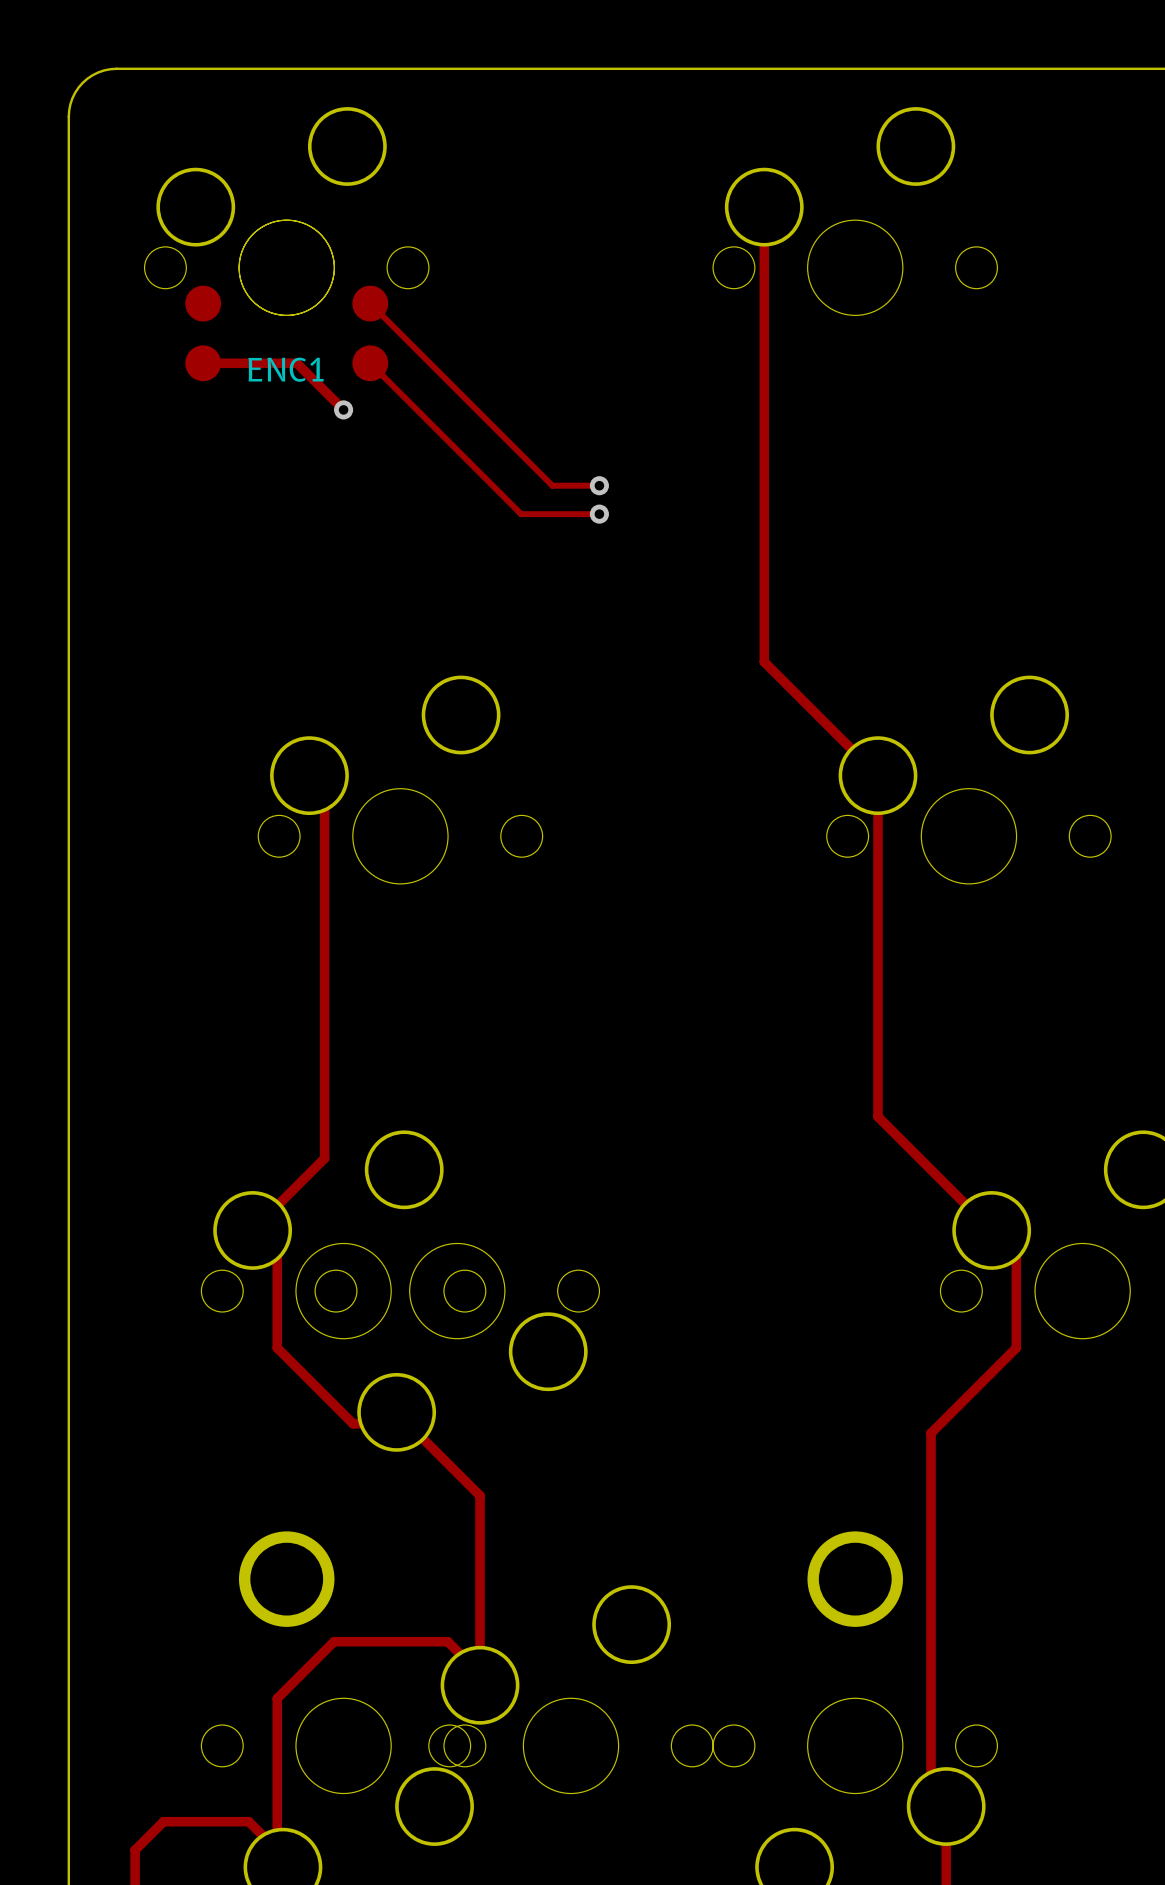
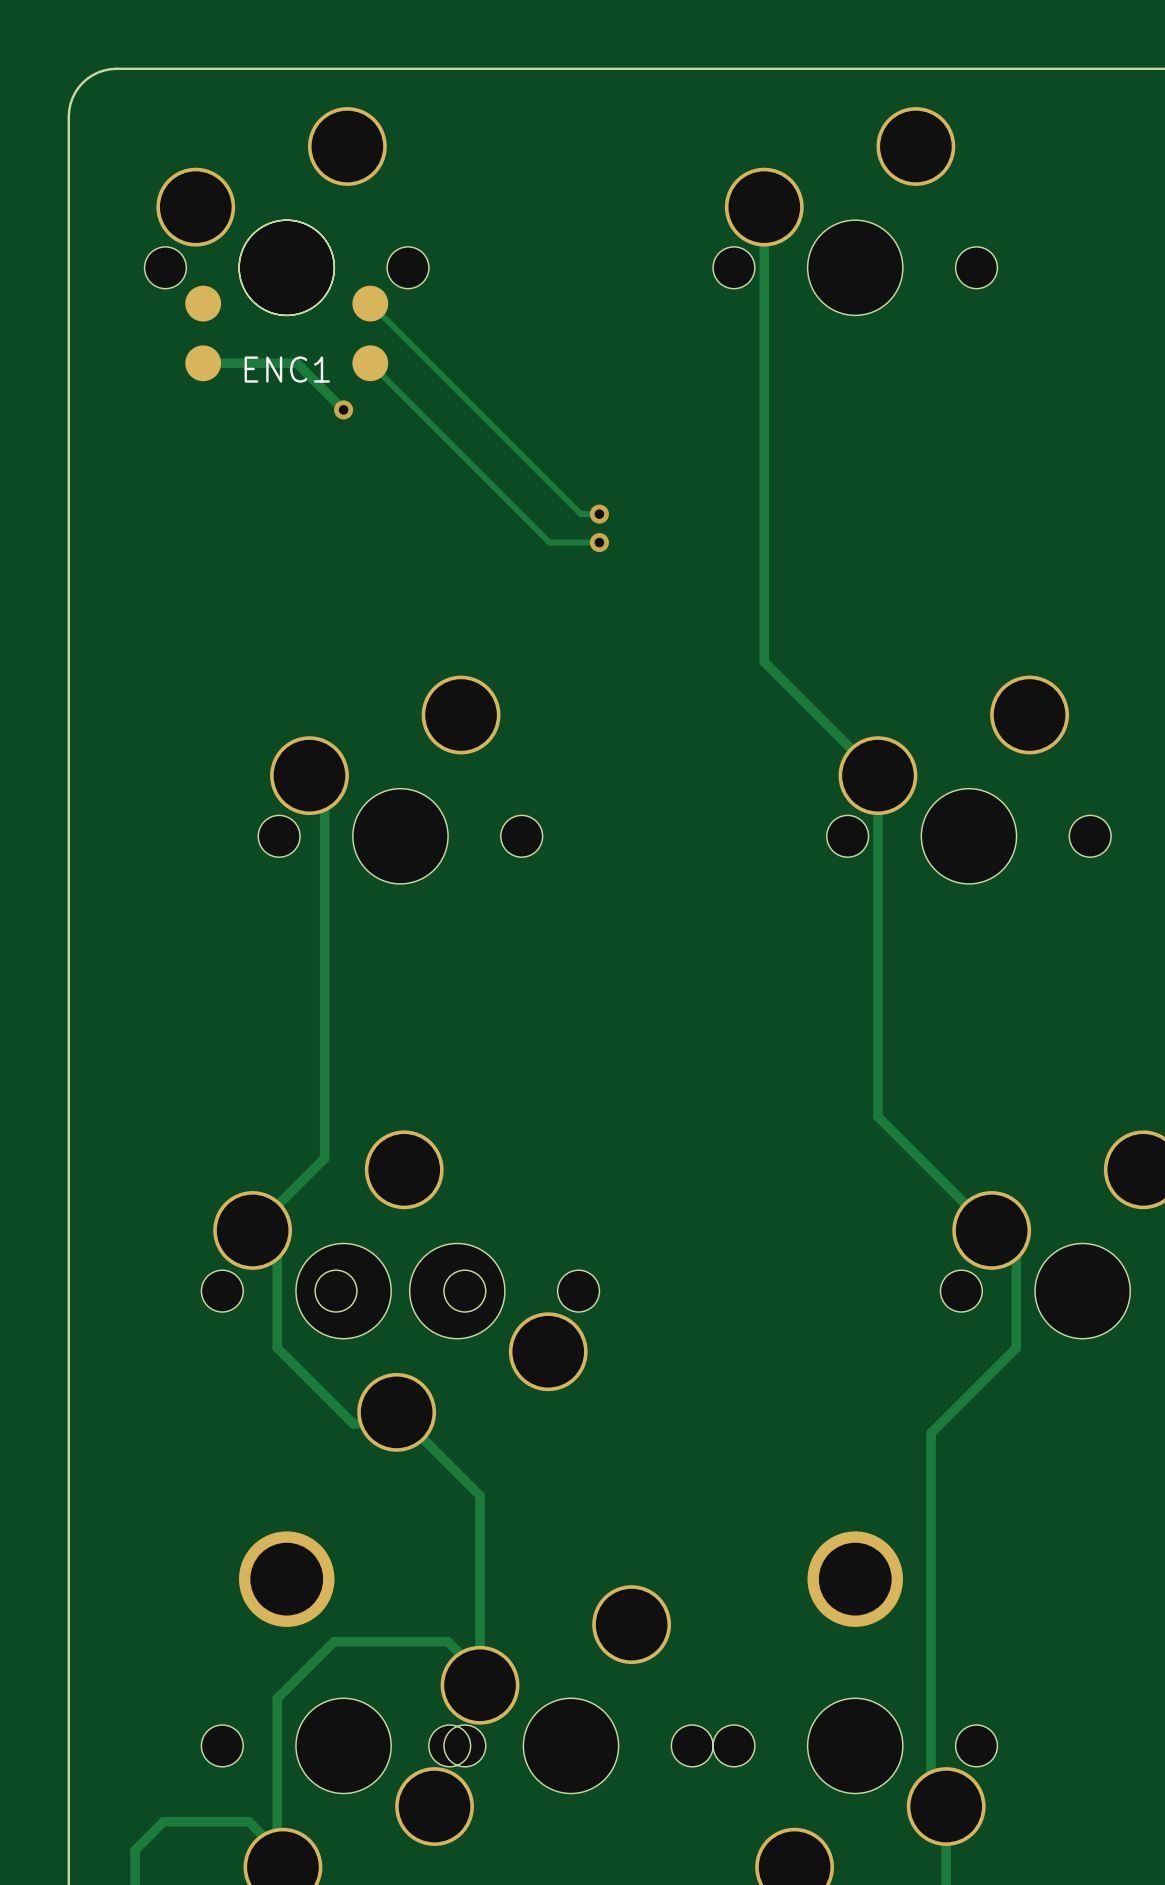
track: (552, 485) (599, 485) -> (552, 485) (580, 514)
via position: (599, 485) -> (599, 542)
track: (521, 514) (580, 514) -> (521, 514) (549, 542) (599, 542)

